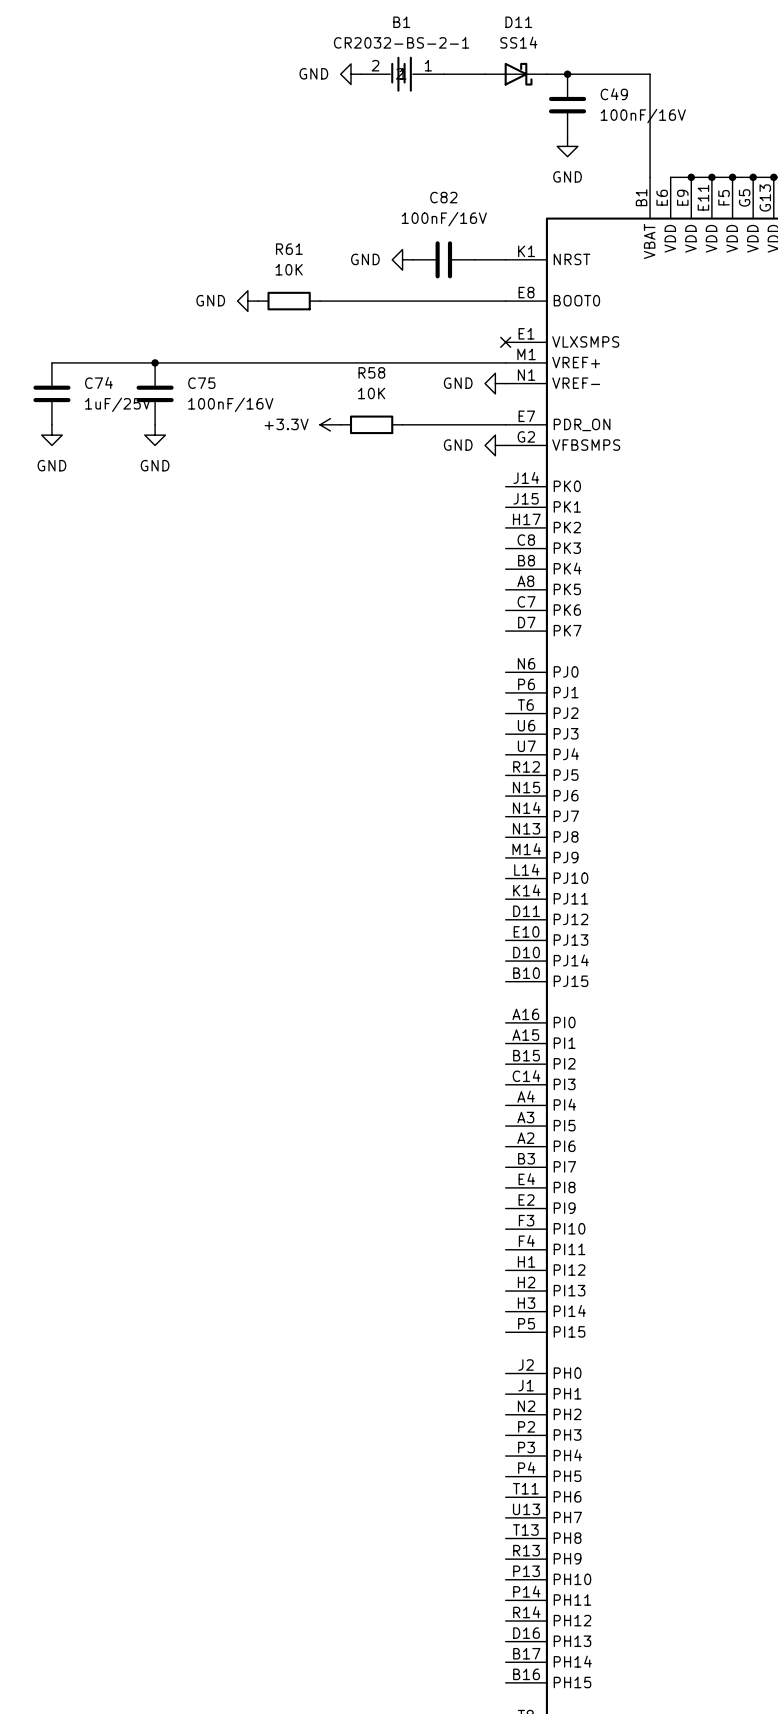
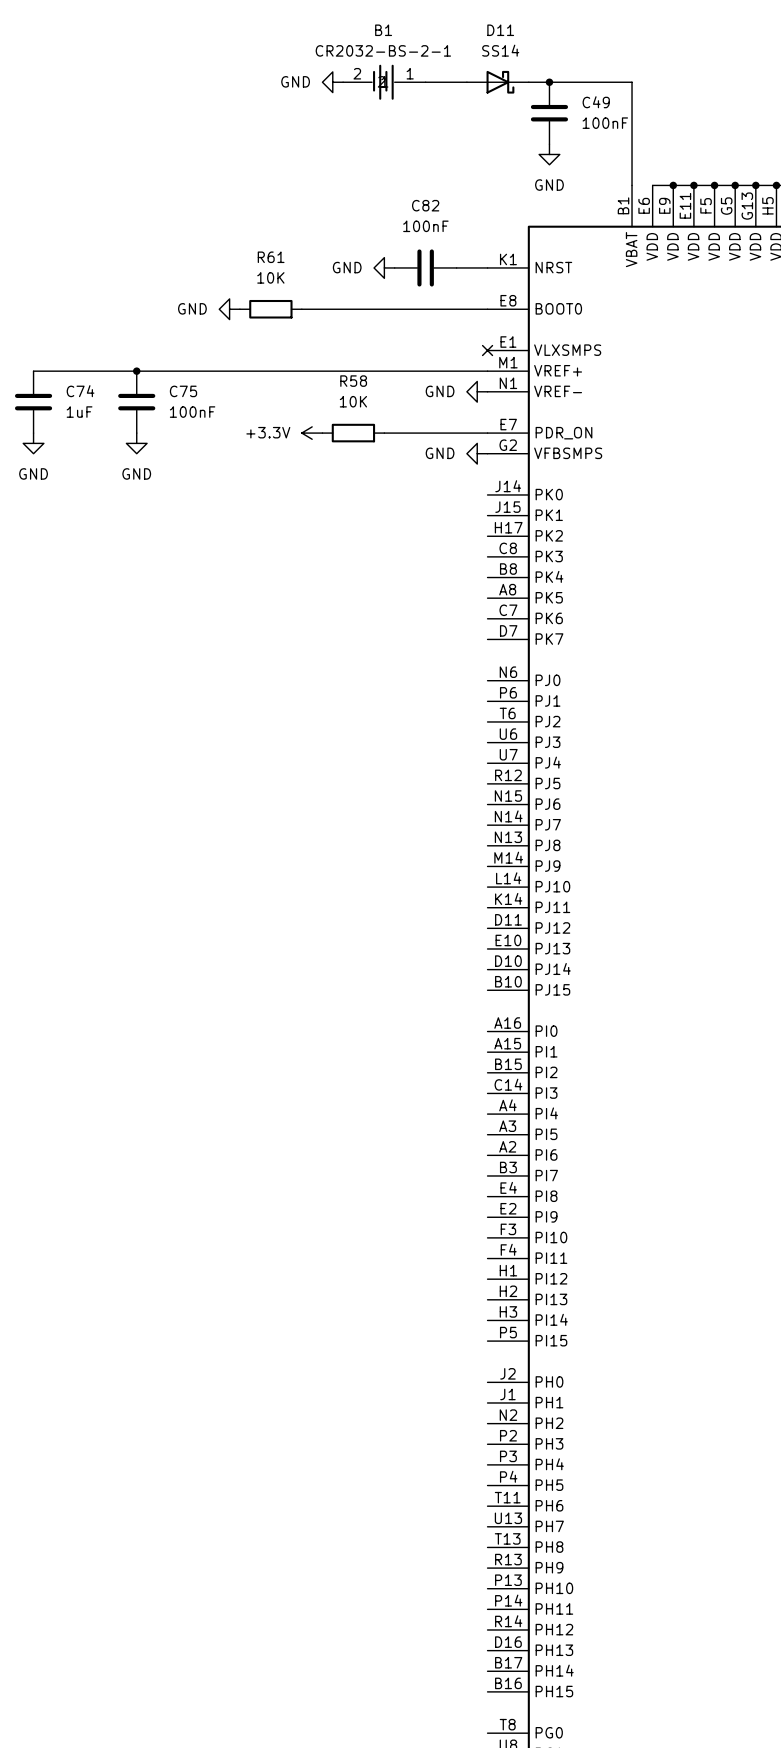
C49 value: 100nF/16V (643, 116) -> 100nF (605, 123)
C82 value: 100nF/16V (444, 219) -> 100nF (425, 226)
C74 value: 1uF/25V (117, 404) -> 1uF (79, 412)
C75 value: 100nF/16V (230, 404) -> 100nF (192, 412)

